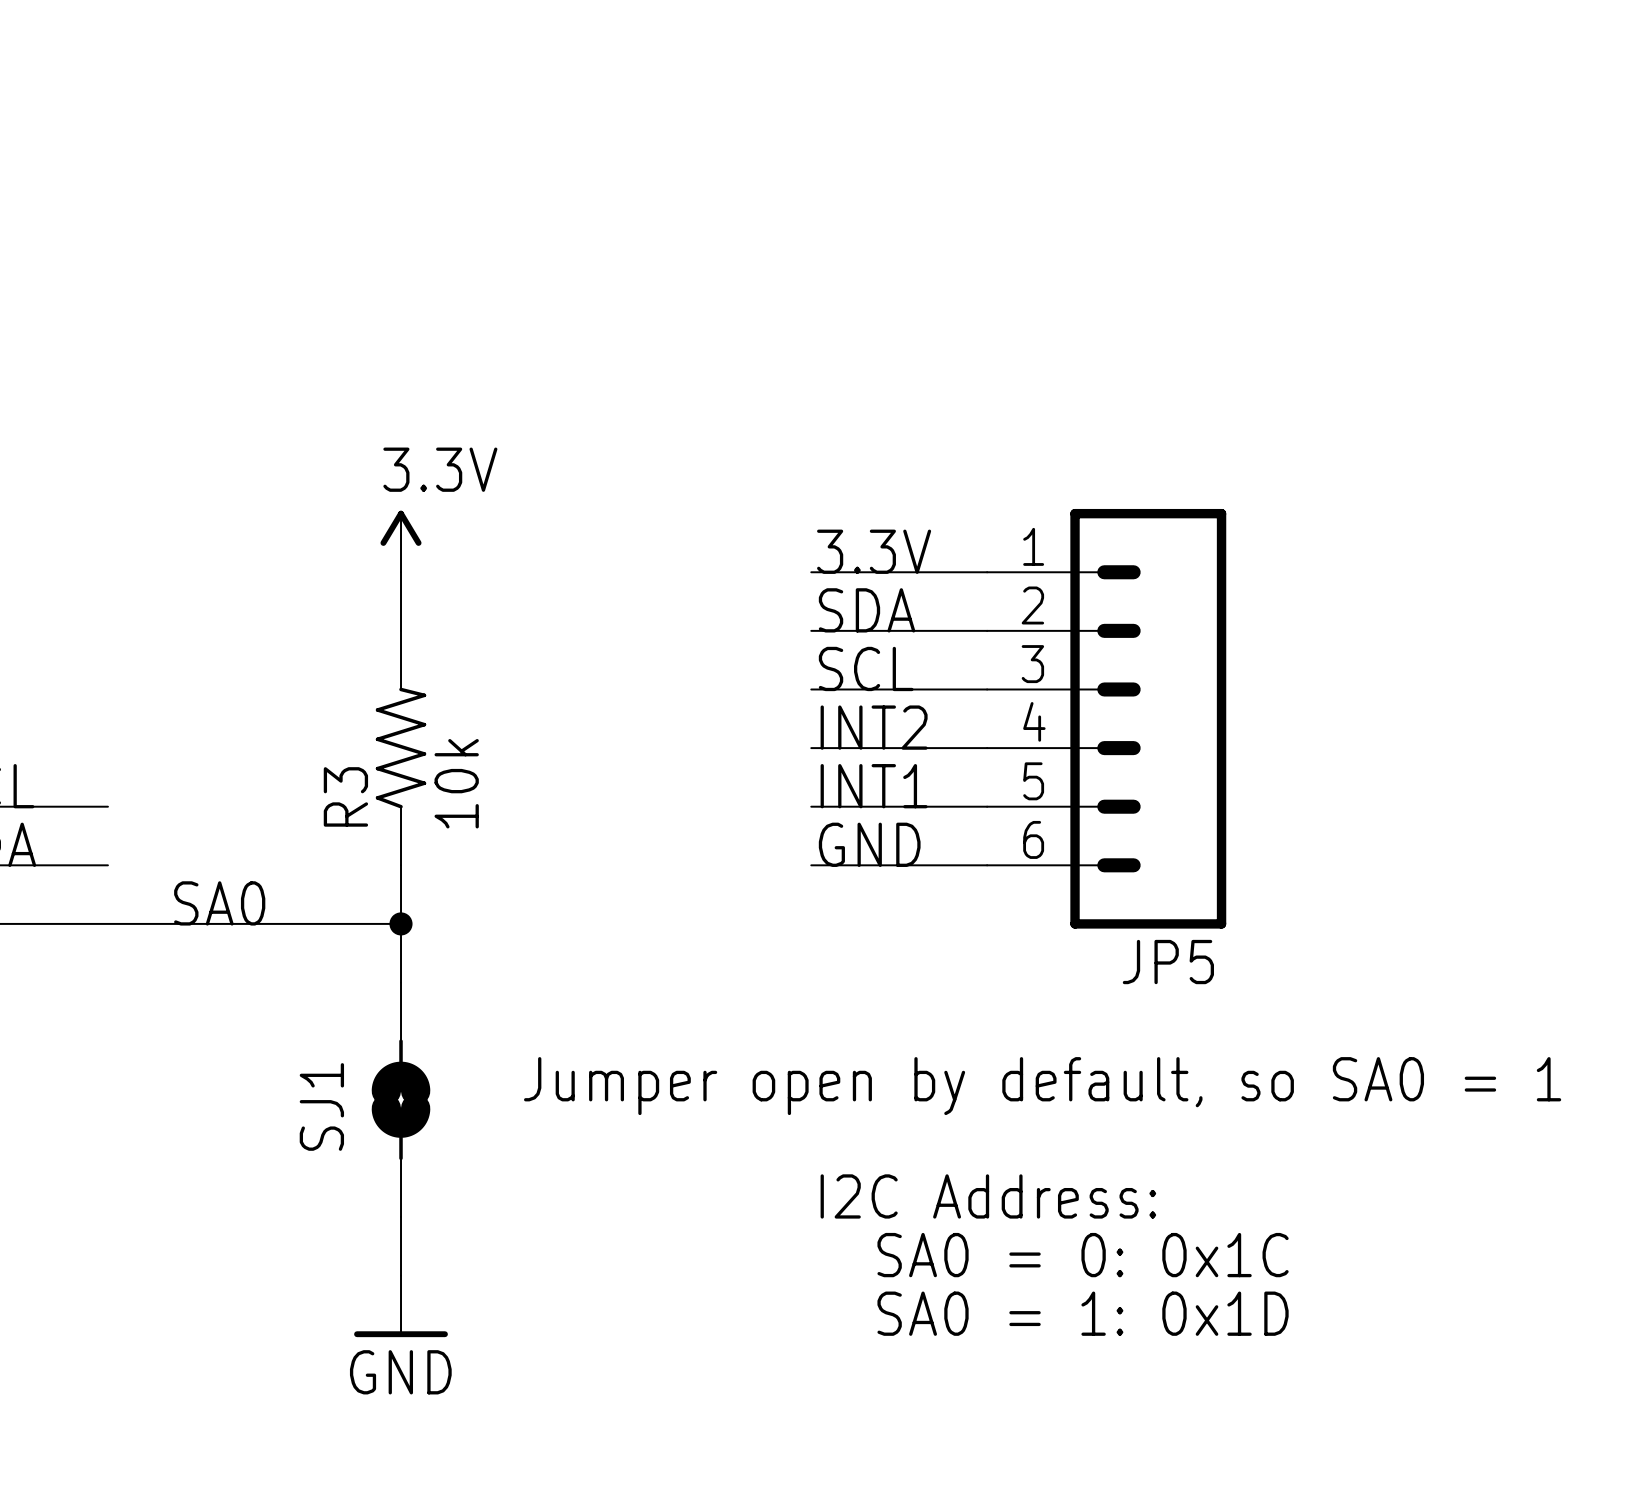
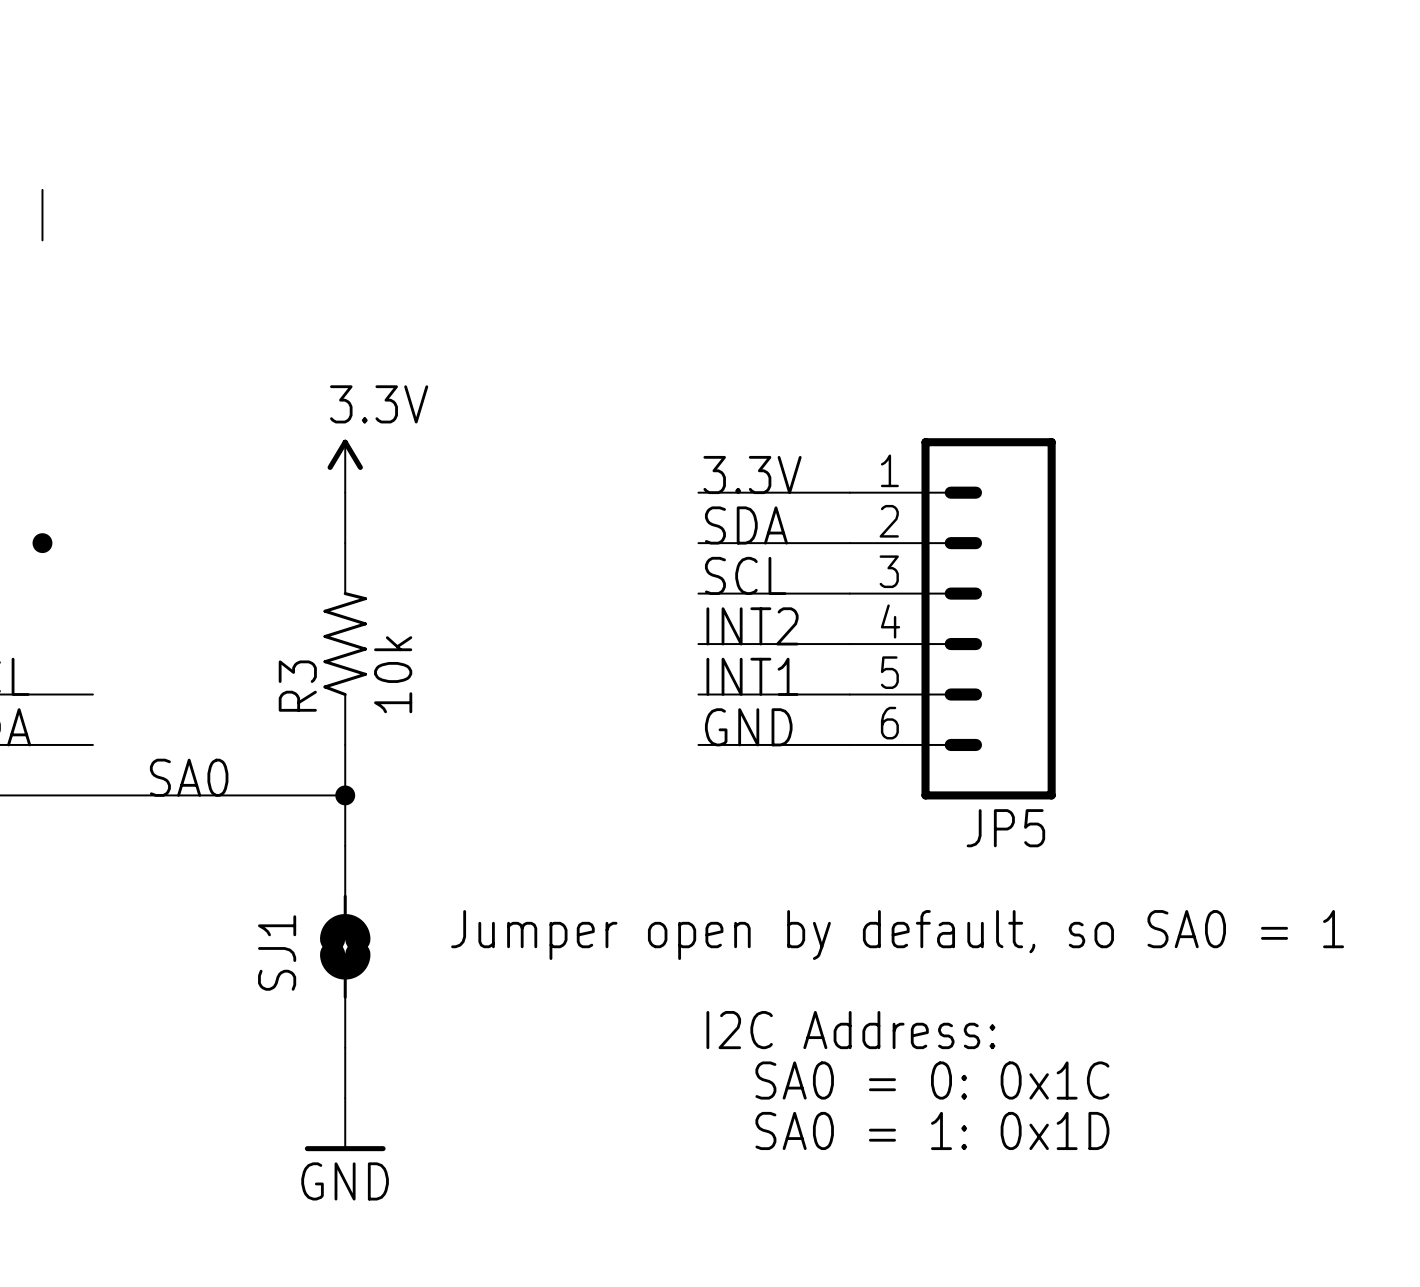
wire: none -> (42, 189) (42, 240)
junction: none -> (42, 543)

